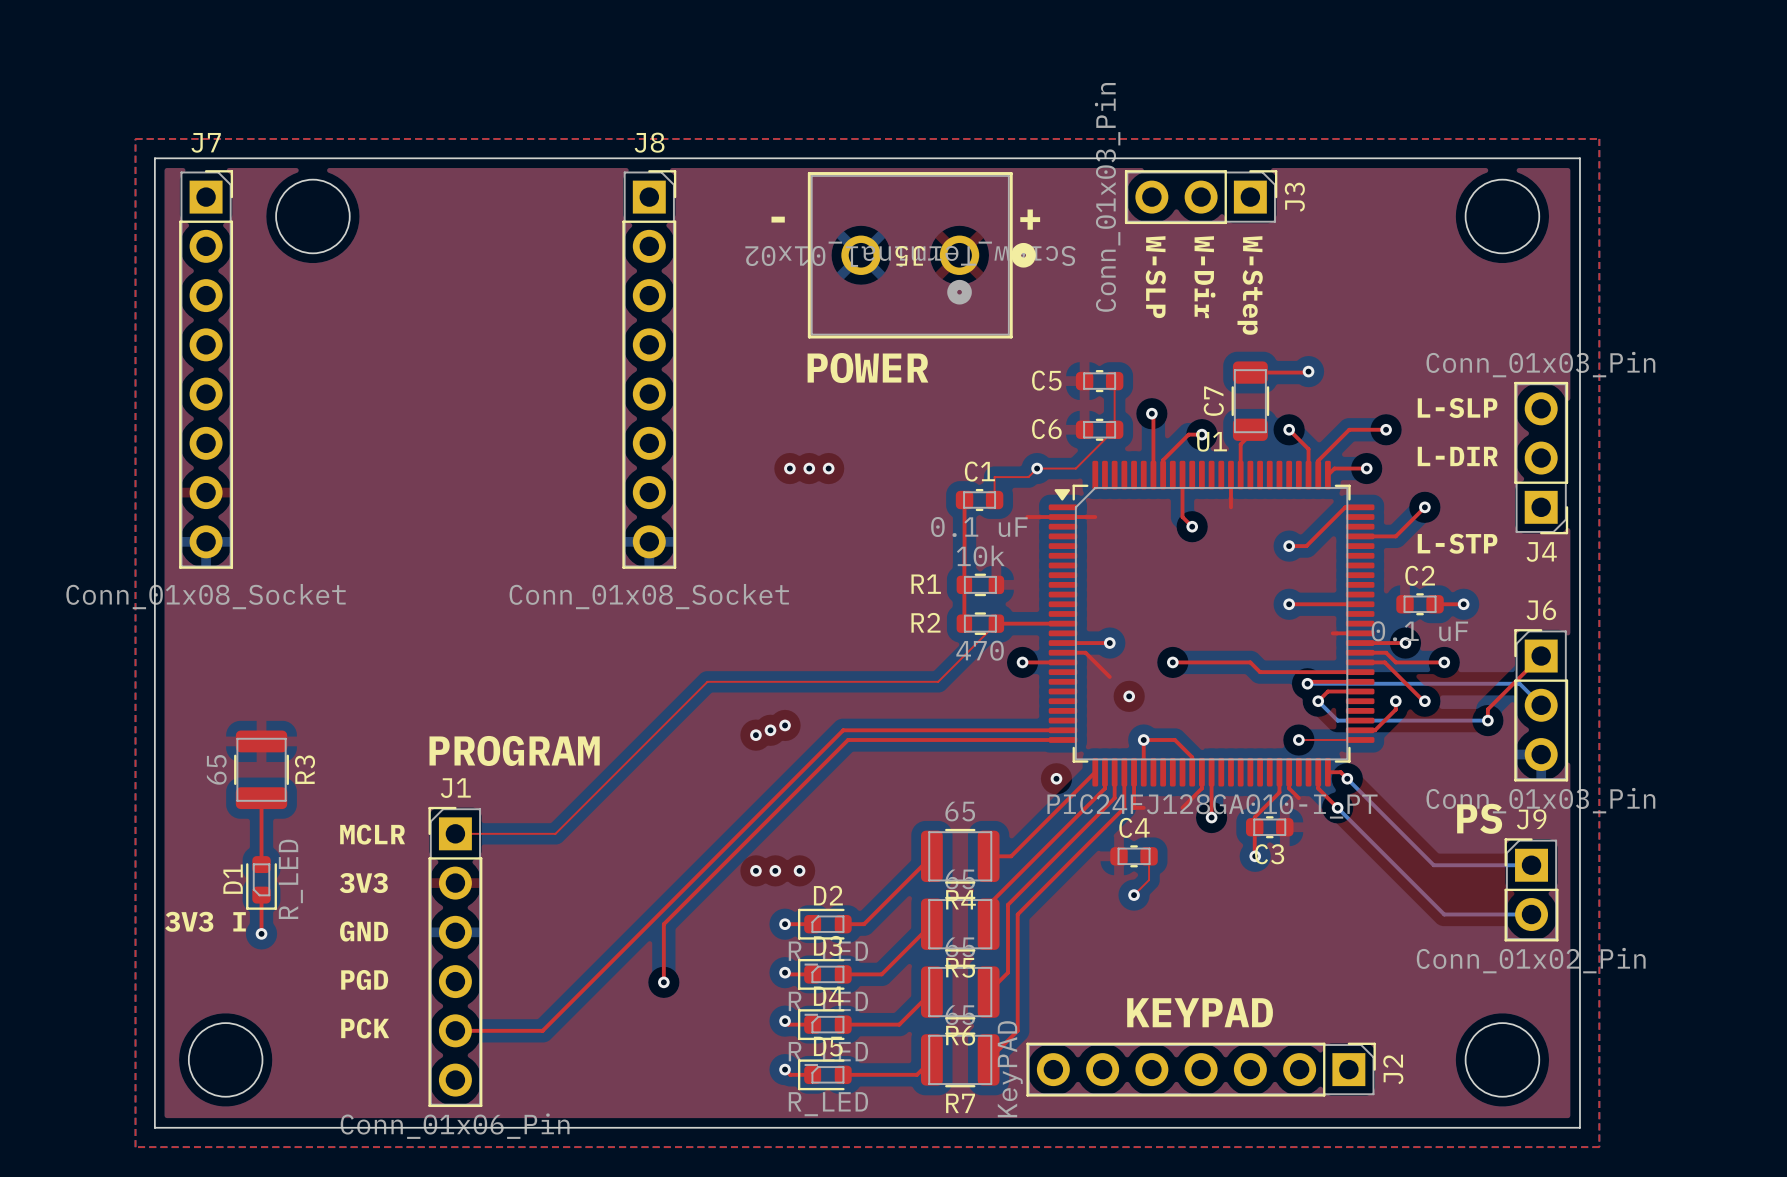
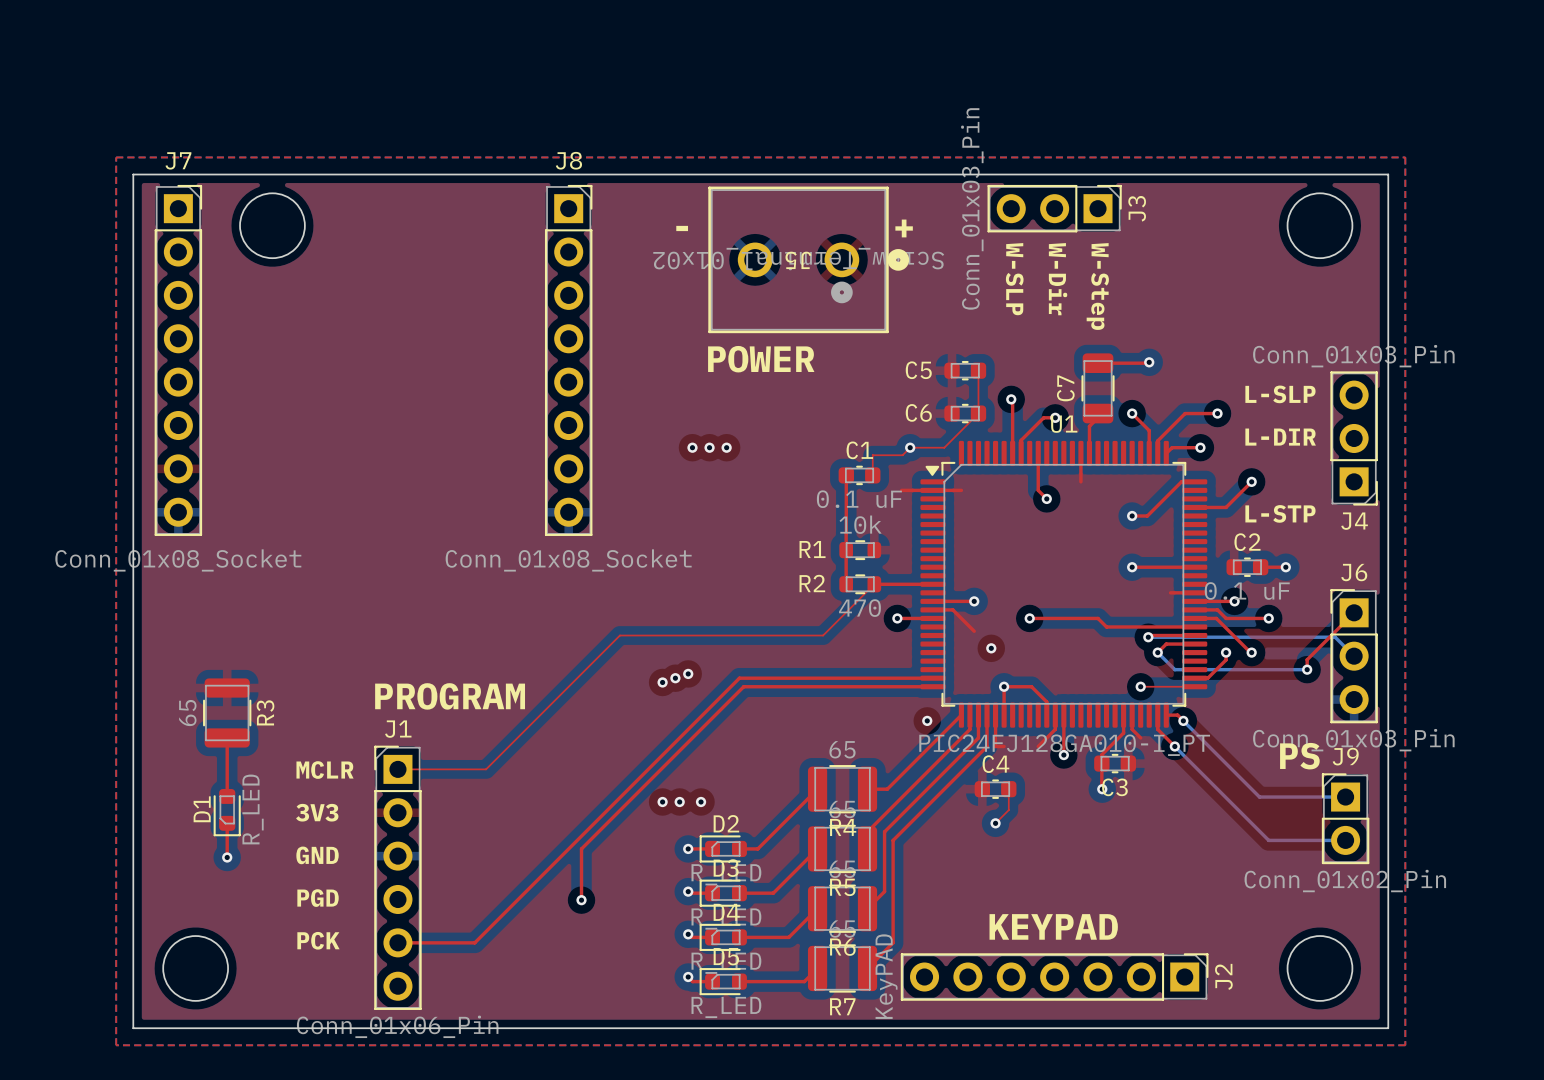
text: 3V3 I (205, 921) -> none

